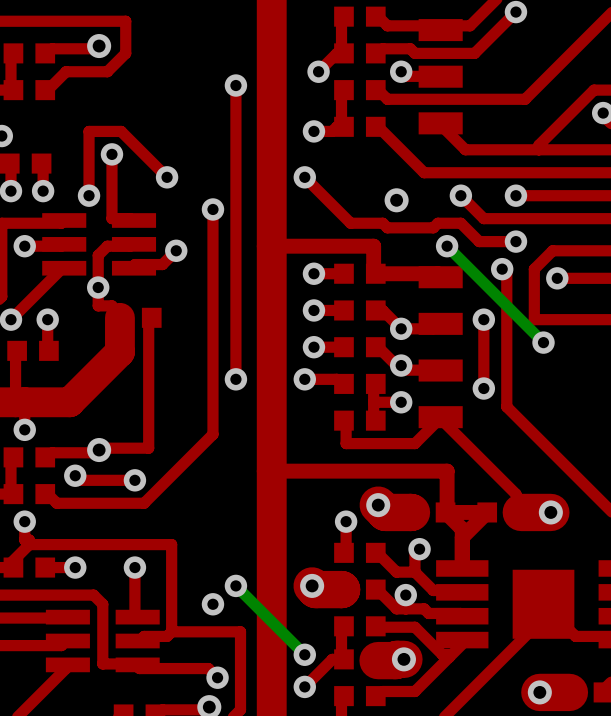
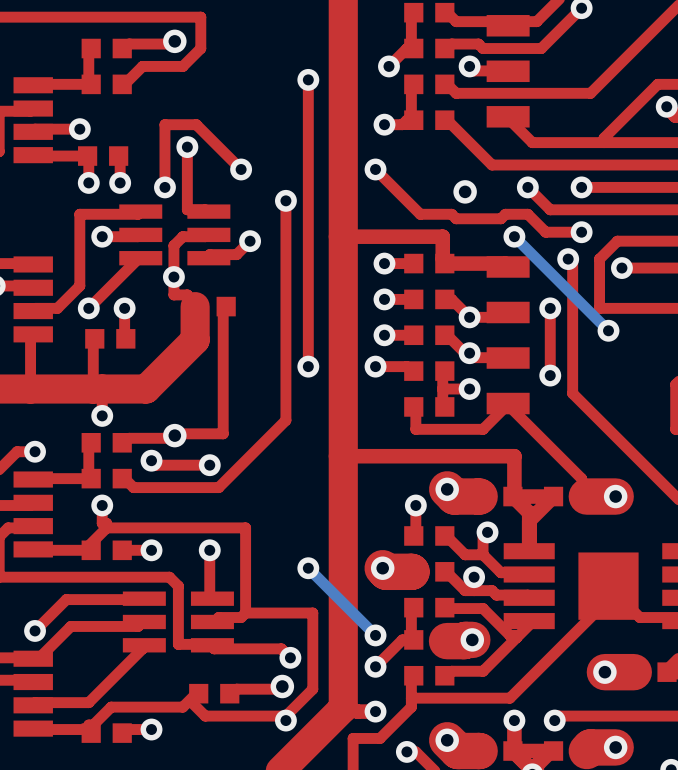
via: (212, 604) -> none

